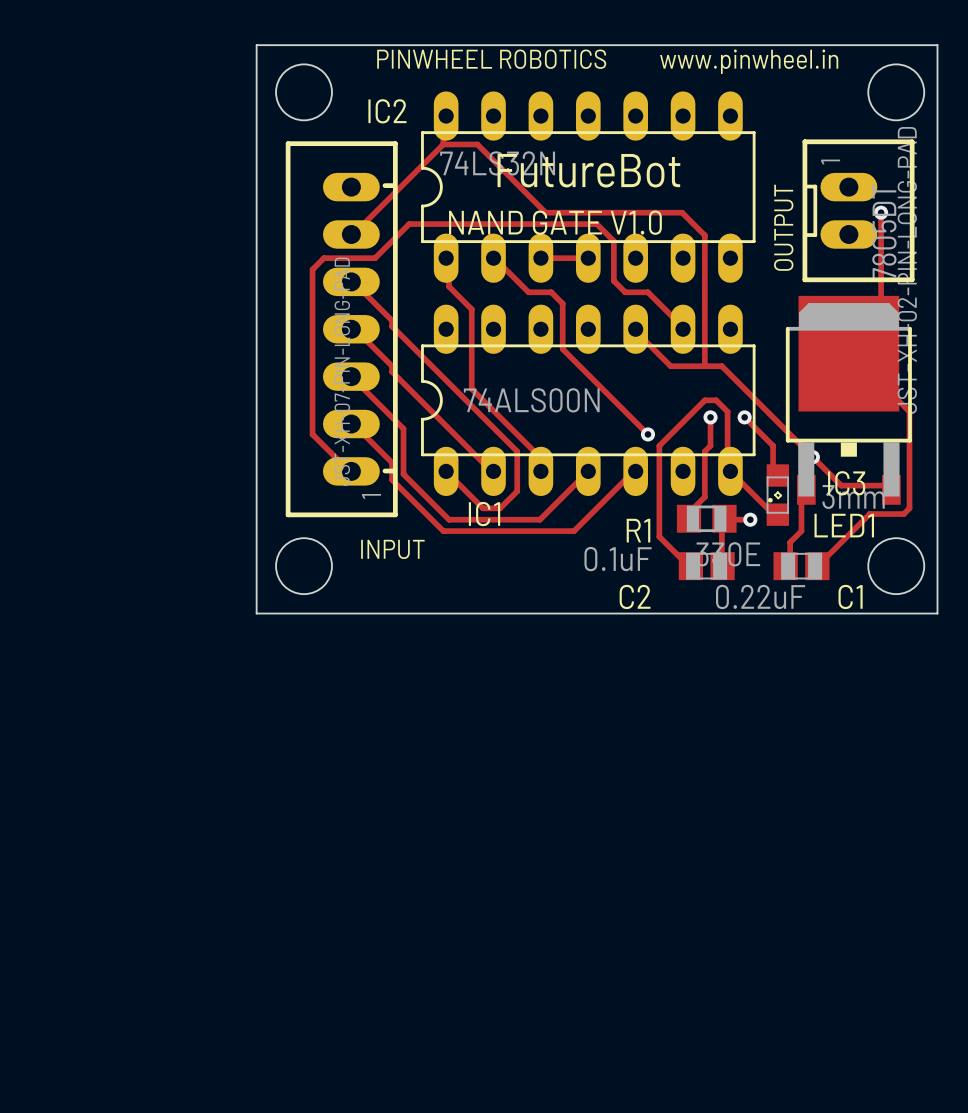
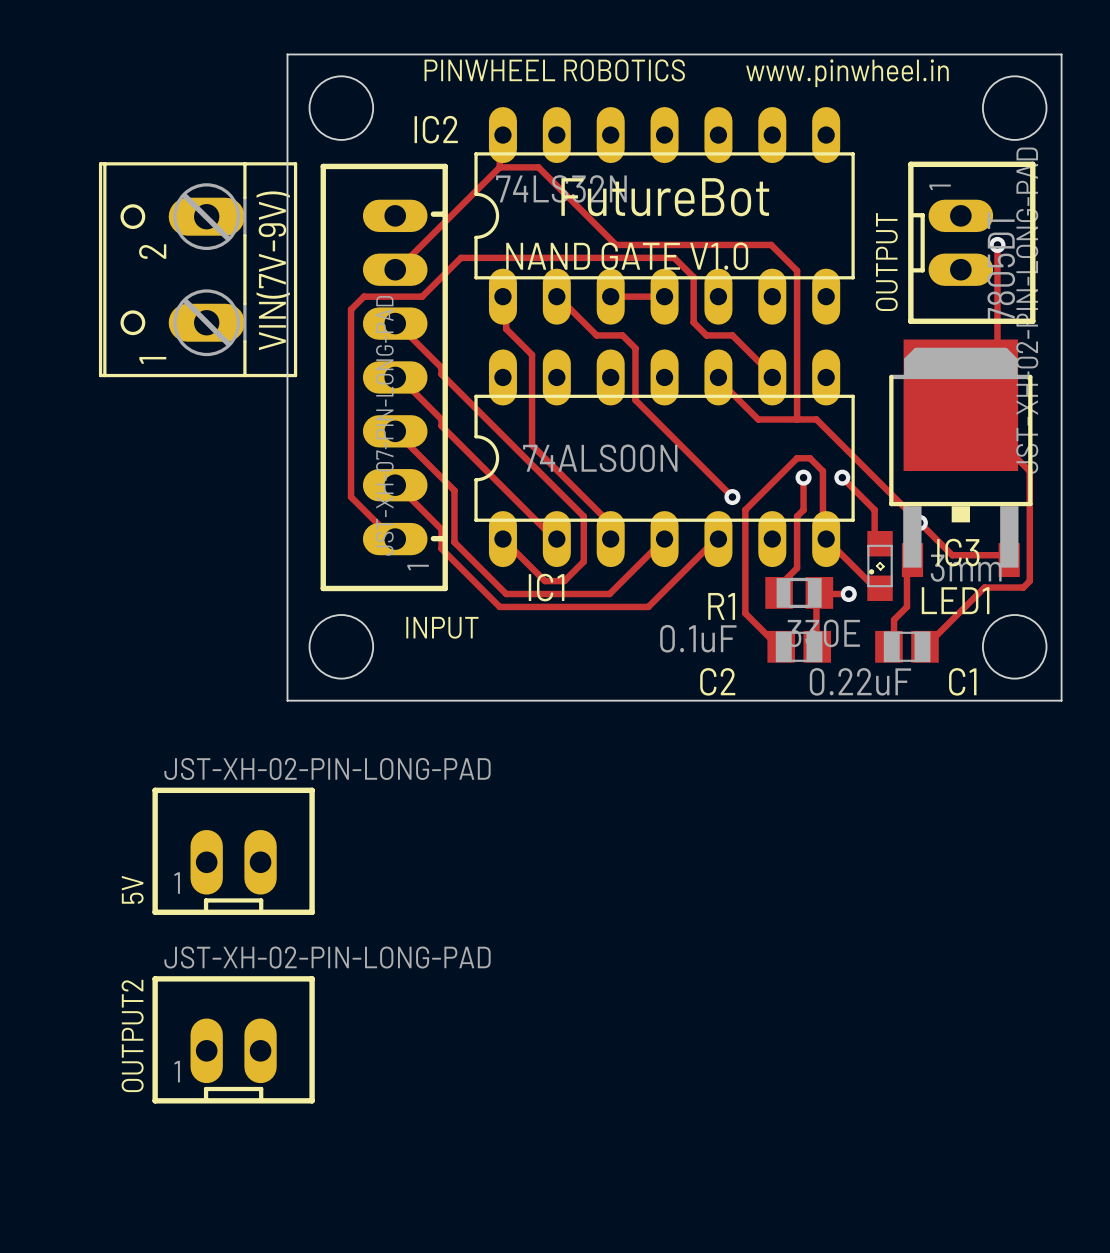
VIN(7V-9V): none -> (198, 269)
5V: none -> JST-XH-02-PIN-LONG-PAD (233, 851)
OUTPUT2: none -> JST-XH-02-PIN-LONG-PAD (233, 1039)

